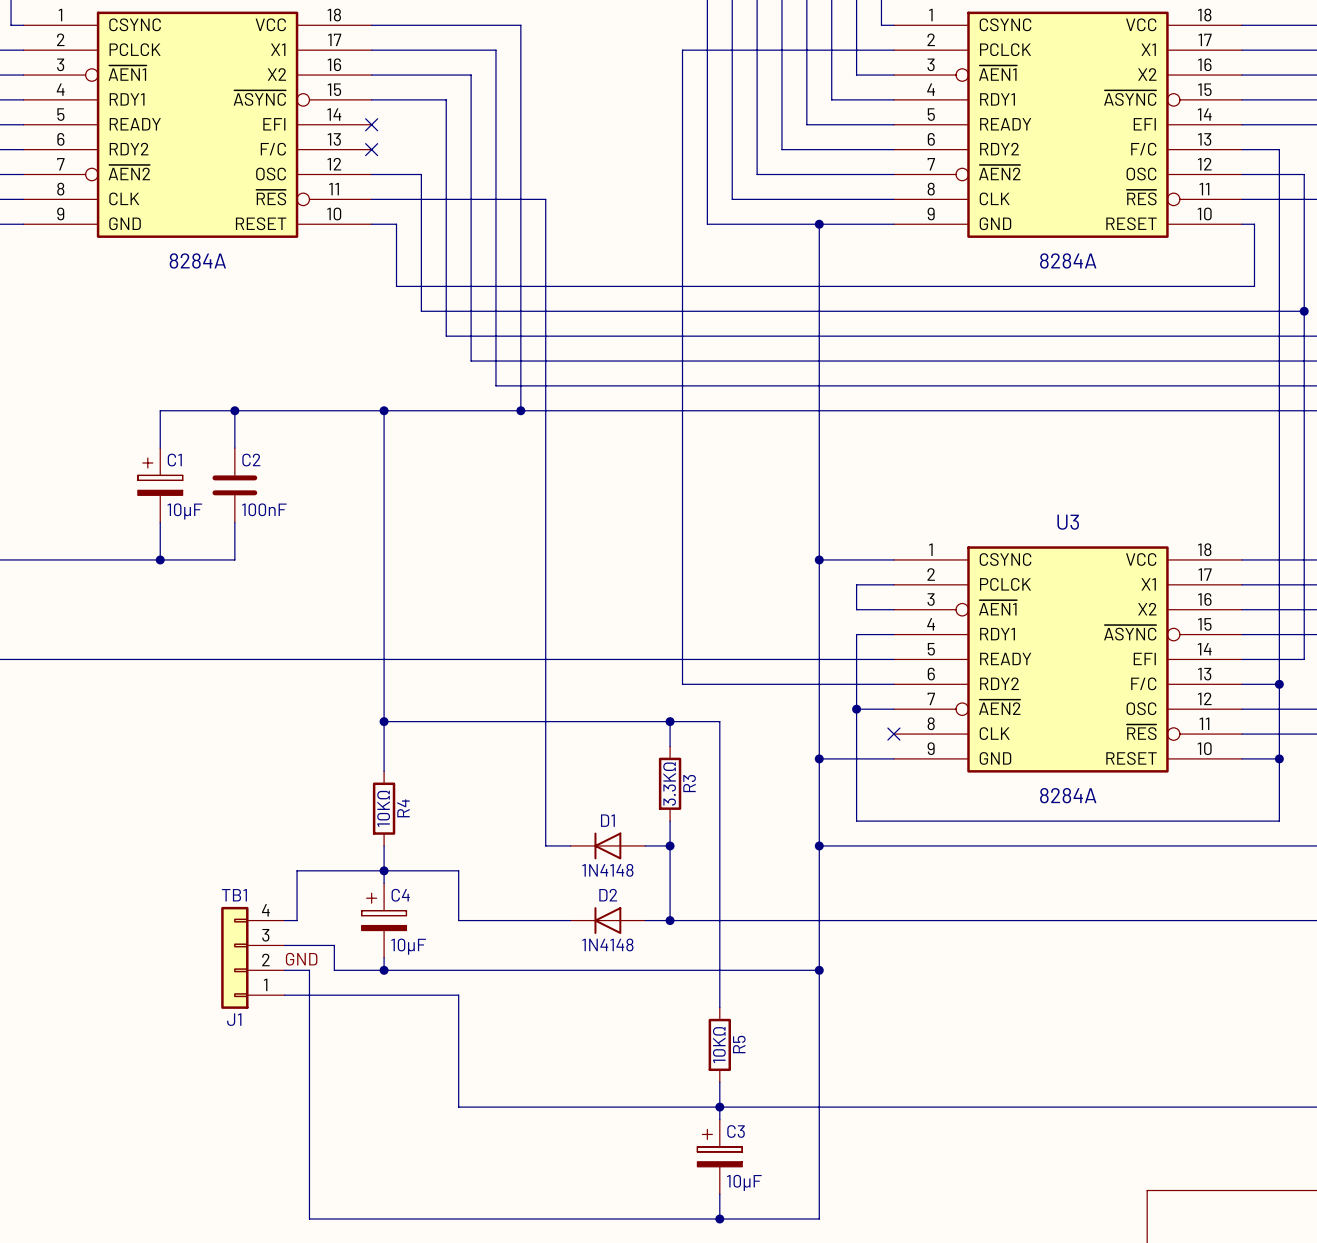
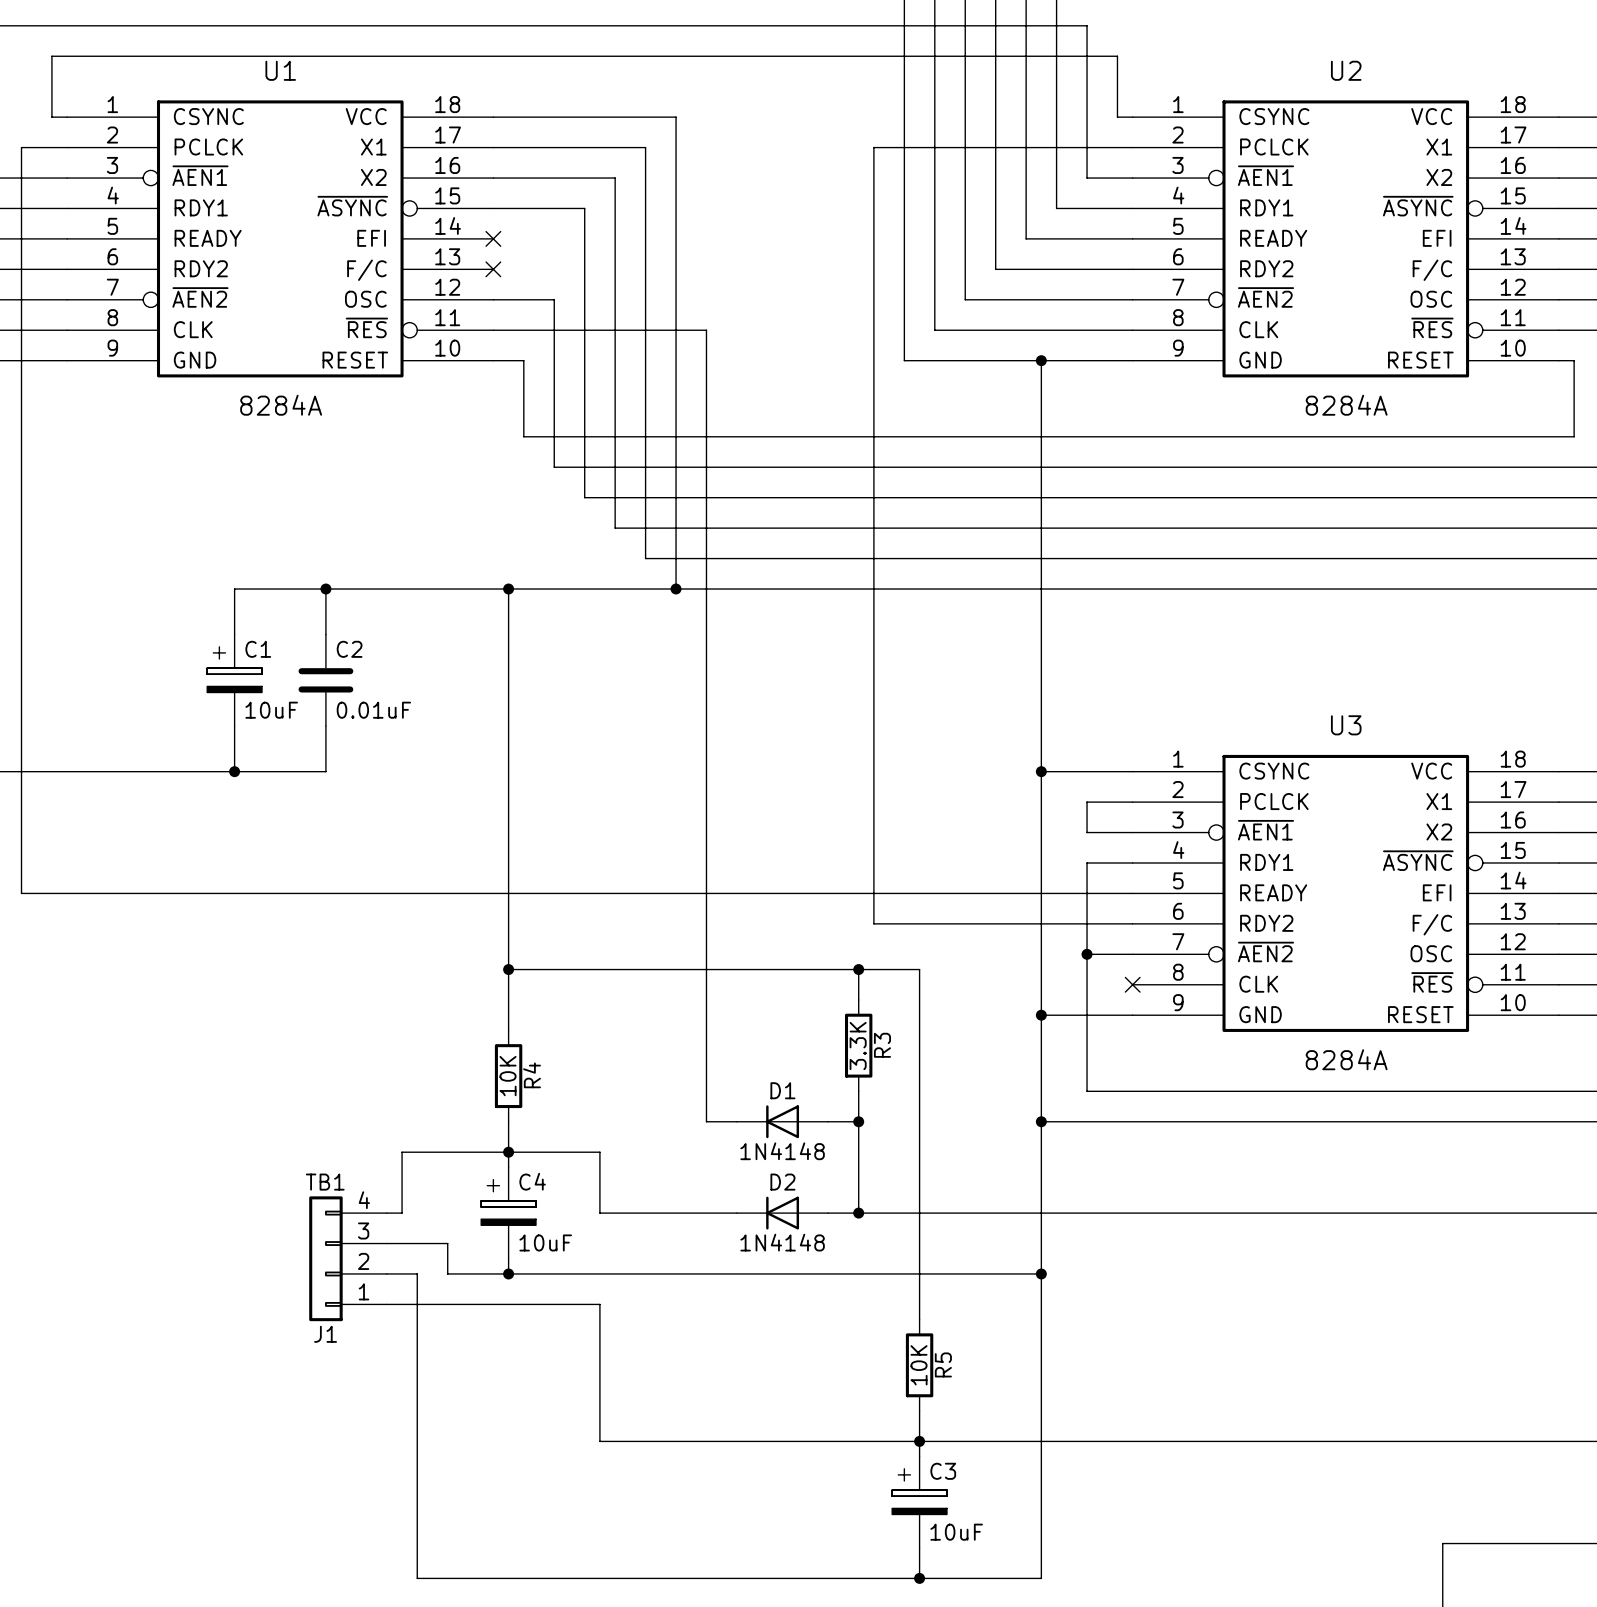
C2 value: 100nF (264, 509) -> 0.01uF (373, 710)
C1 value: 10µF (184, 511) -> 10uF (271, 710)
R3 value: 3.3KΩ (669, 783) -> 3.3K (858, 1046)
R4 value: 10KΩ (383, 808) -> 10K (508, 1076)
C4 value: 10µF (408, 946) -> 10uF (545, 1242)
label: GND (301, 959) -> none
R5 value: 10KΩ (719, 1045) -> 10K (919, 1365)
C3 value: 10µF (744, 1182) -> 10uF (956, 1532)

